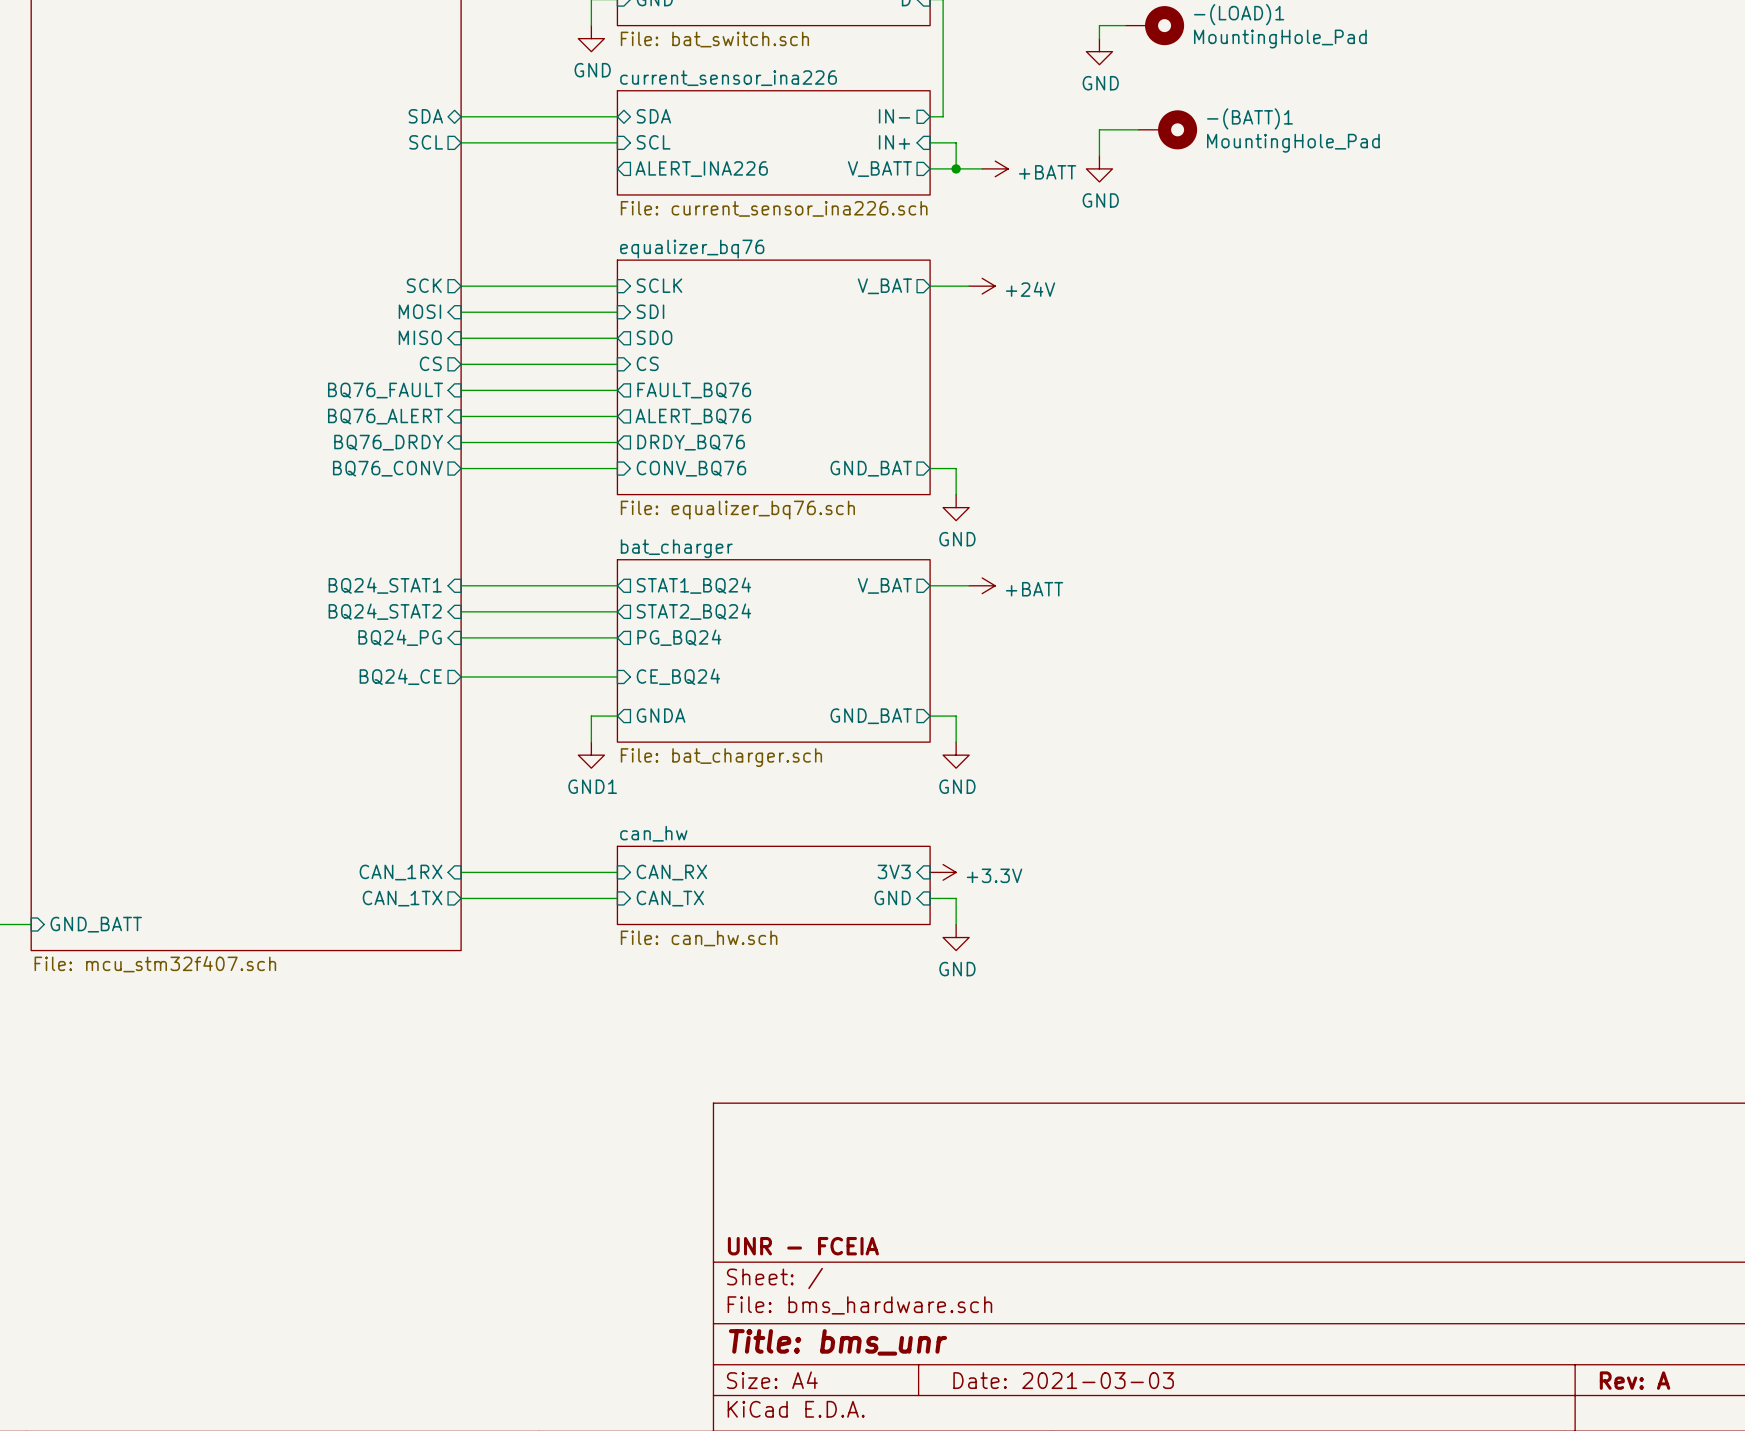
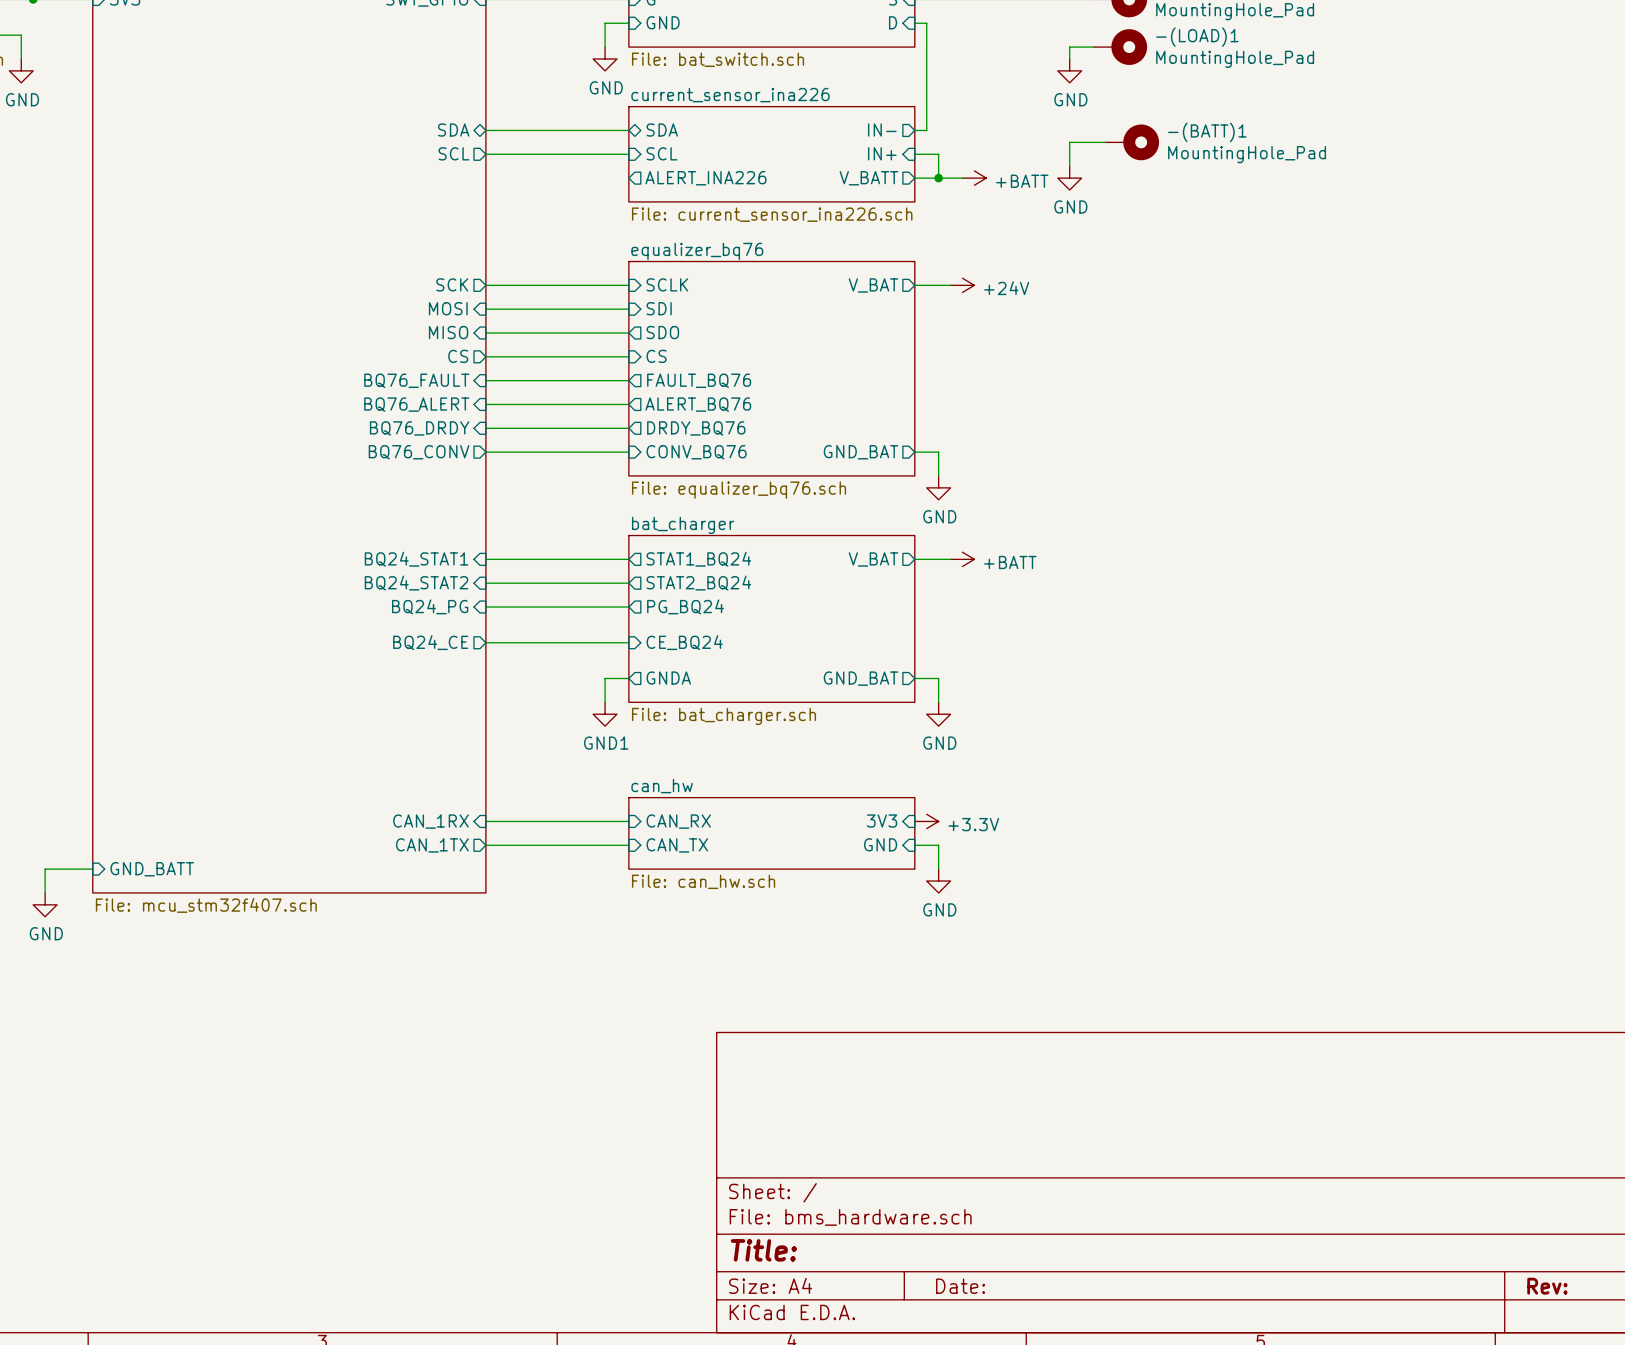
title block: UNR - FCEIA (803, 1246) -> none
title block: Title: bms_unr (837, 1342) -> Title: (763, 1250)
title block: Date: 2021-03-03 (1063, 1380) -> Date: (960, 1286)
title block: Rev: A (1635, 1380) -> Rev: (1547, 1286)

